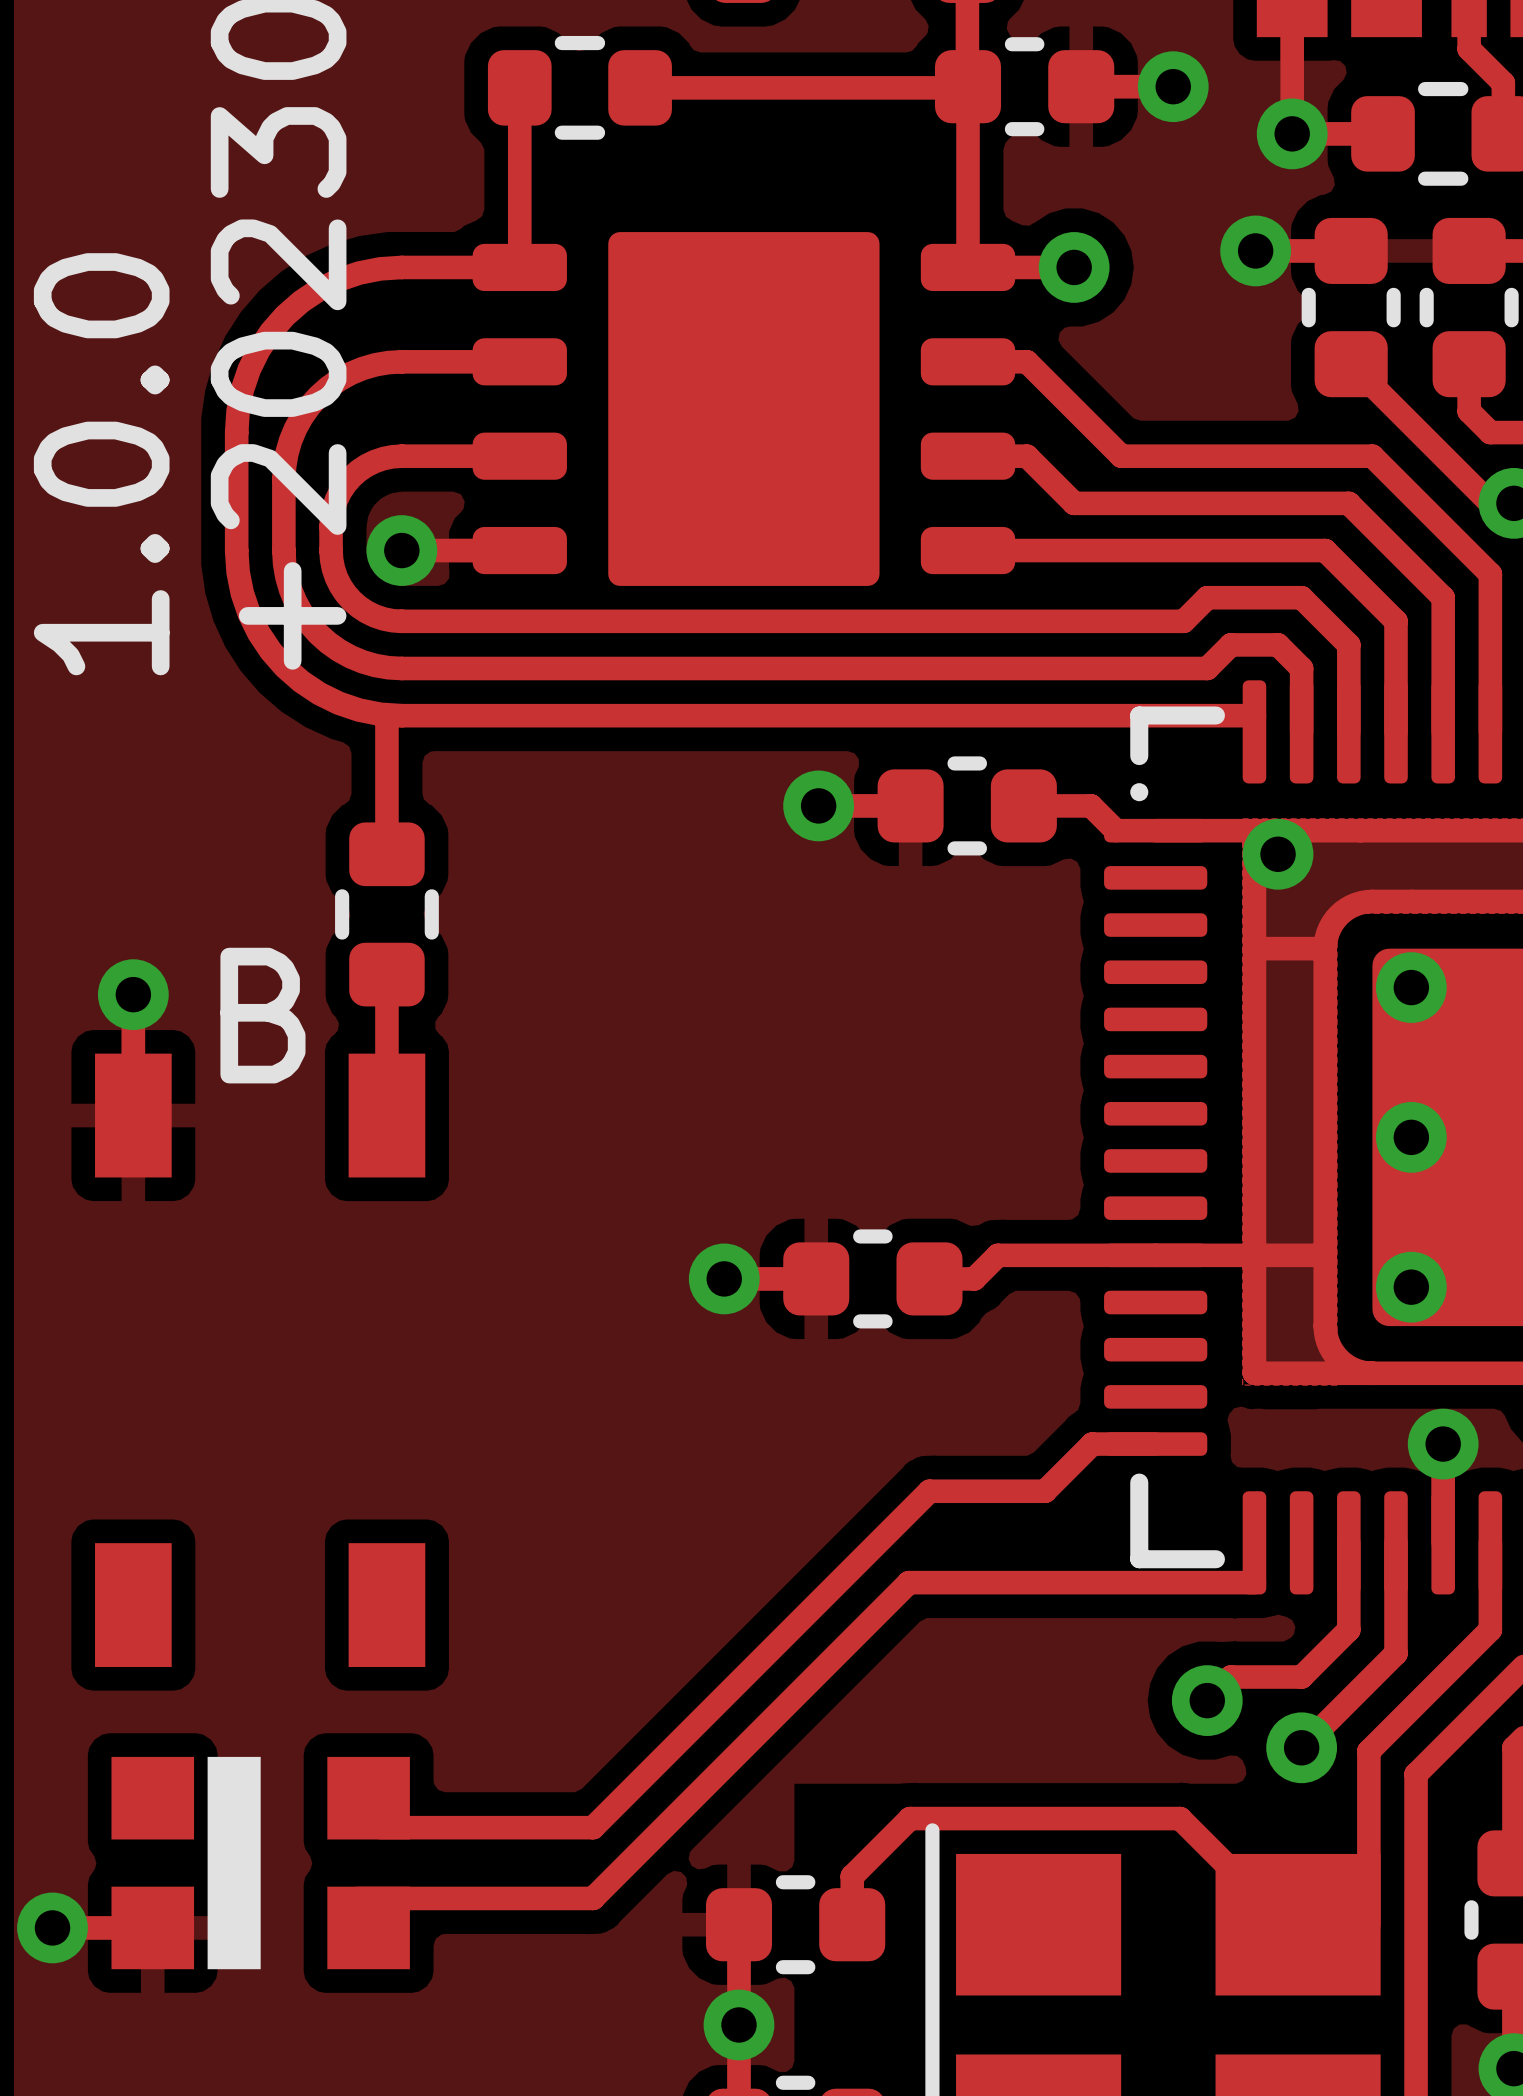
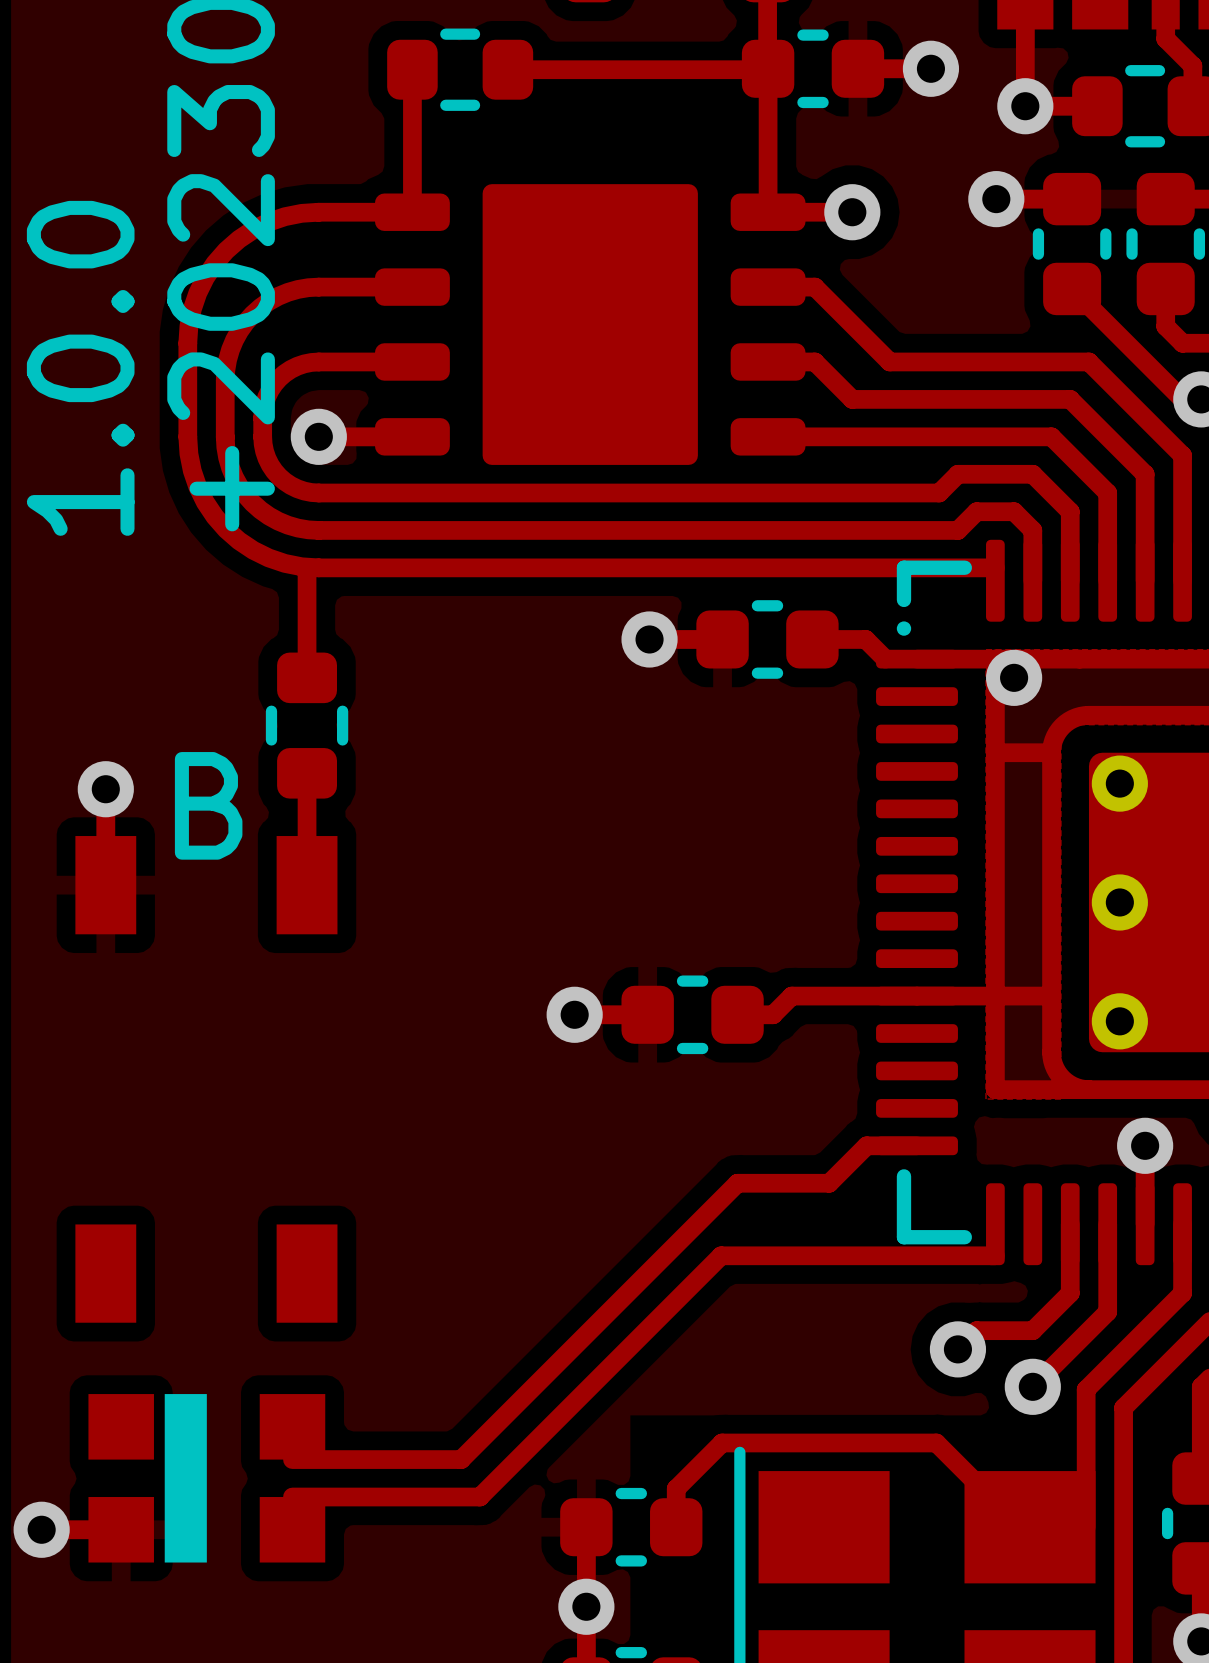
track: (380, 1827) (593, 1827) -> (292, 1459) (461, 1459) (470, 1450)
track: (604, 1886) (593, 1898) (356, 1898) -> (479, 1497) (292, 1497)

